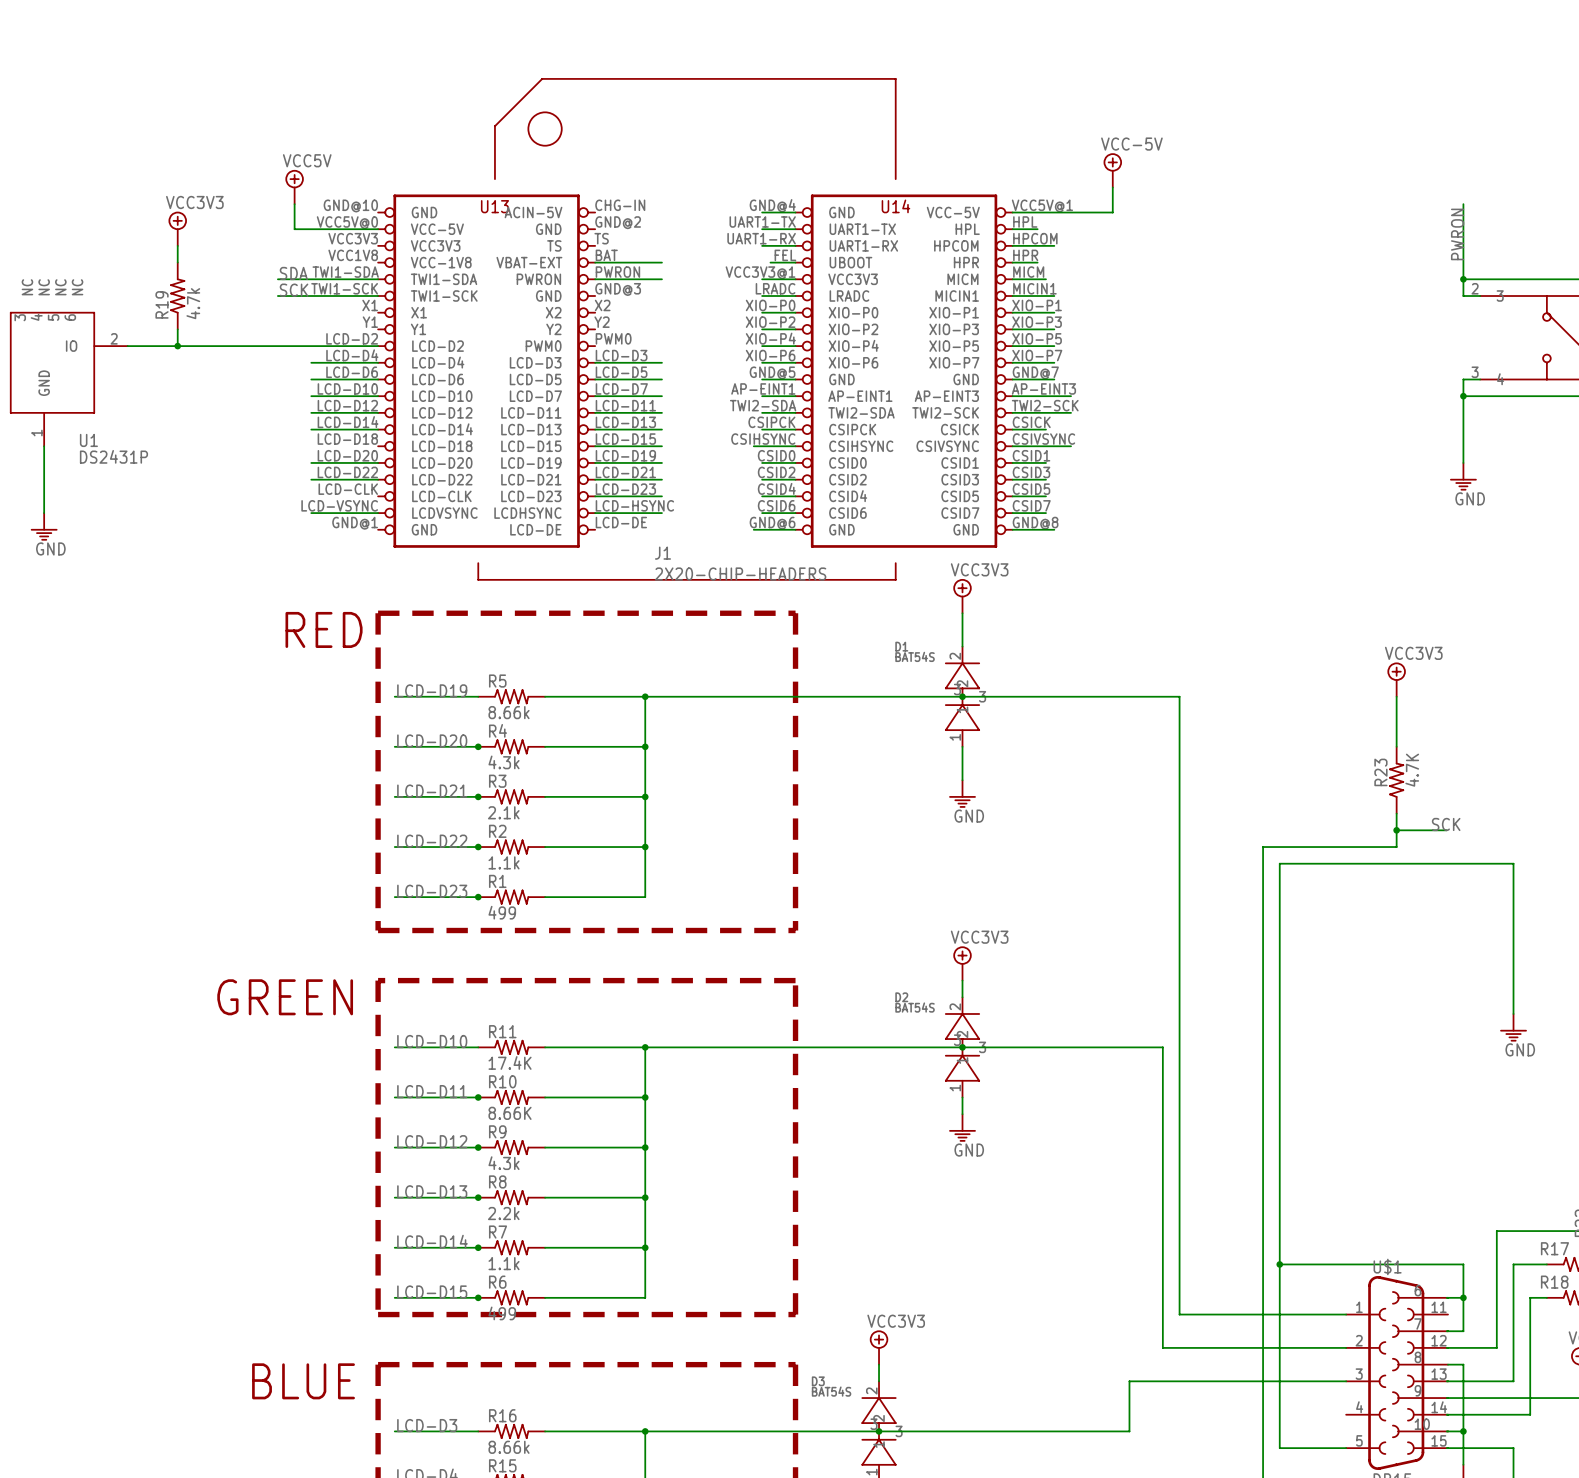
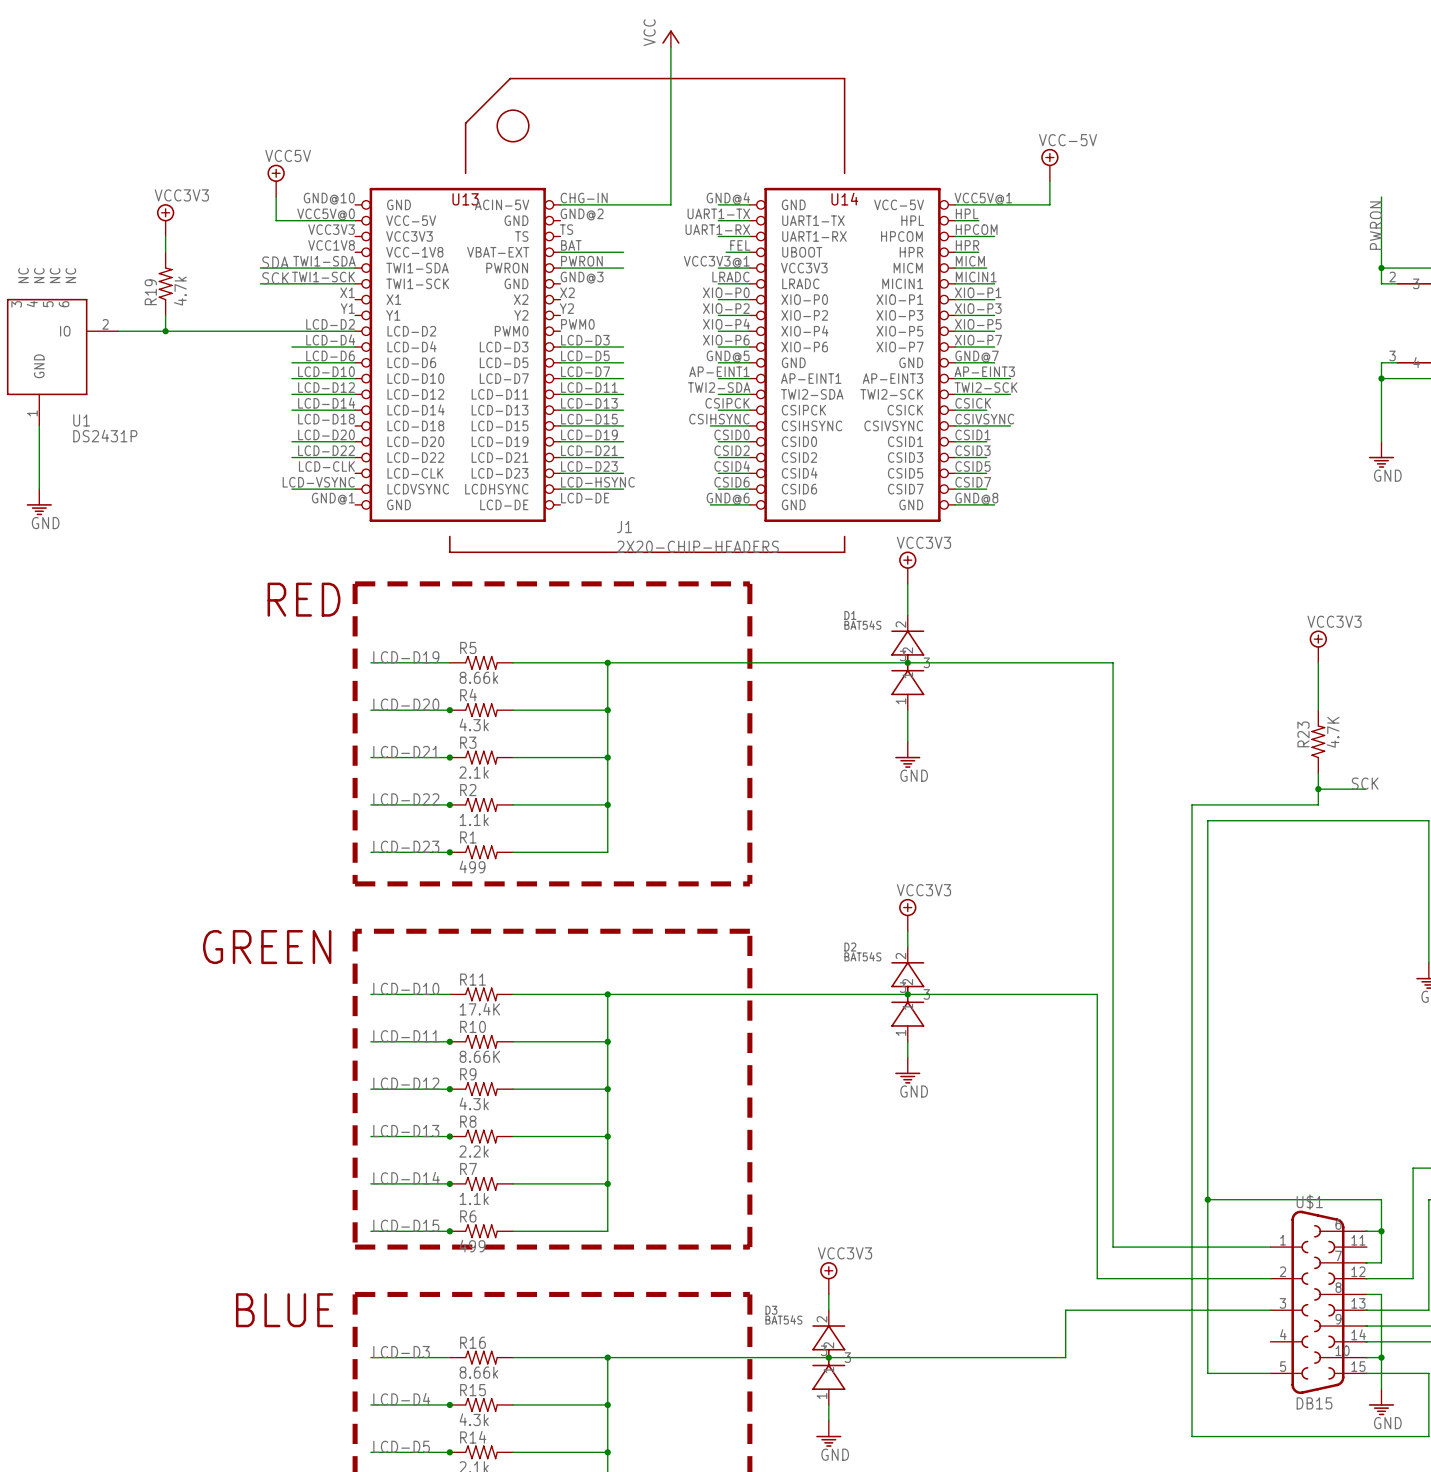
power symbol: none -> VCC (670, 38)
wire: none -> (670, 46) (670, 204) (560, 204)

